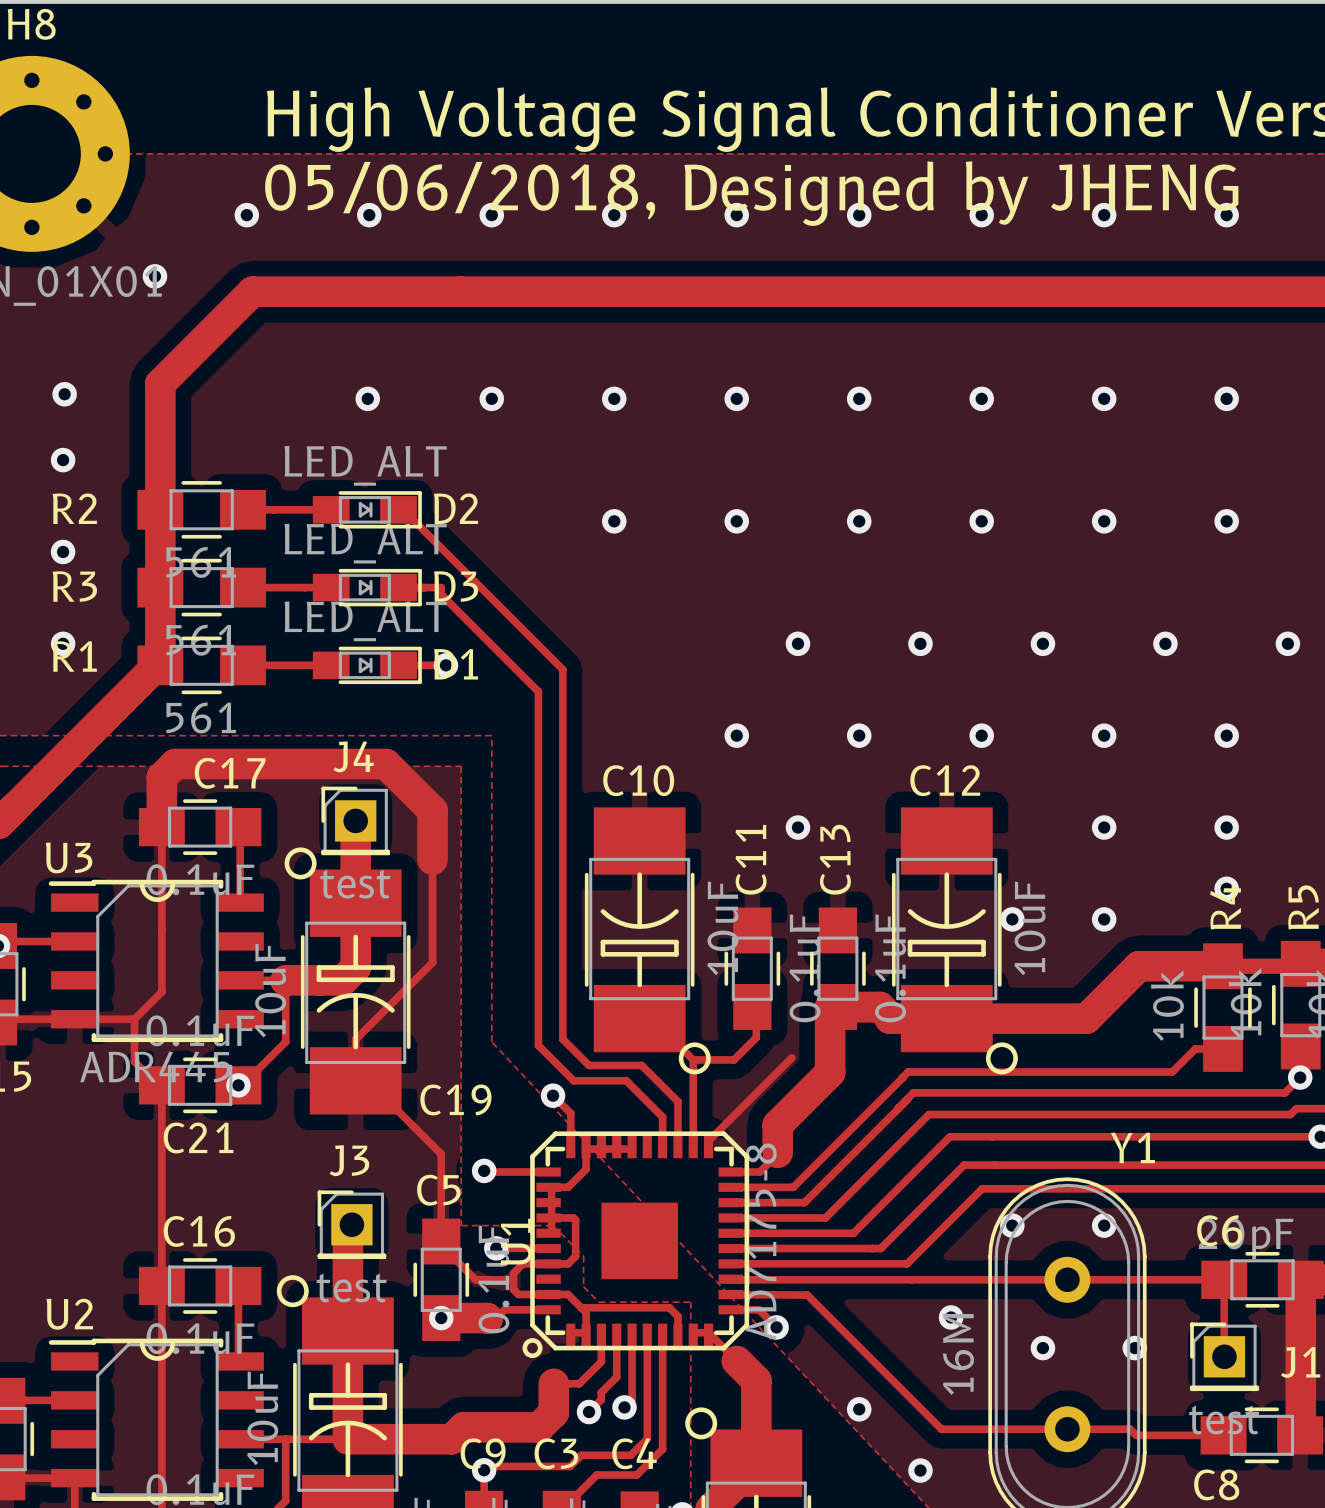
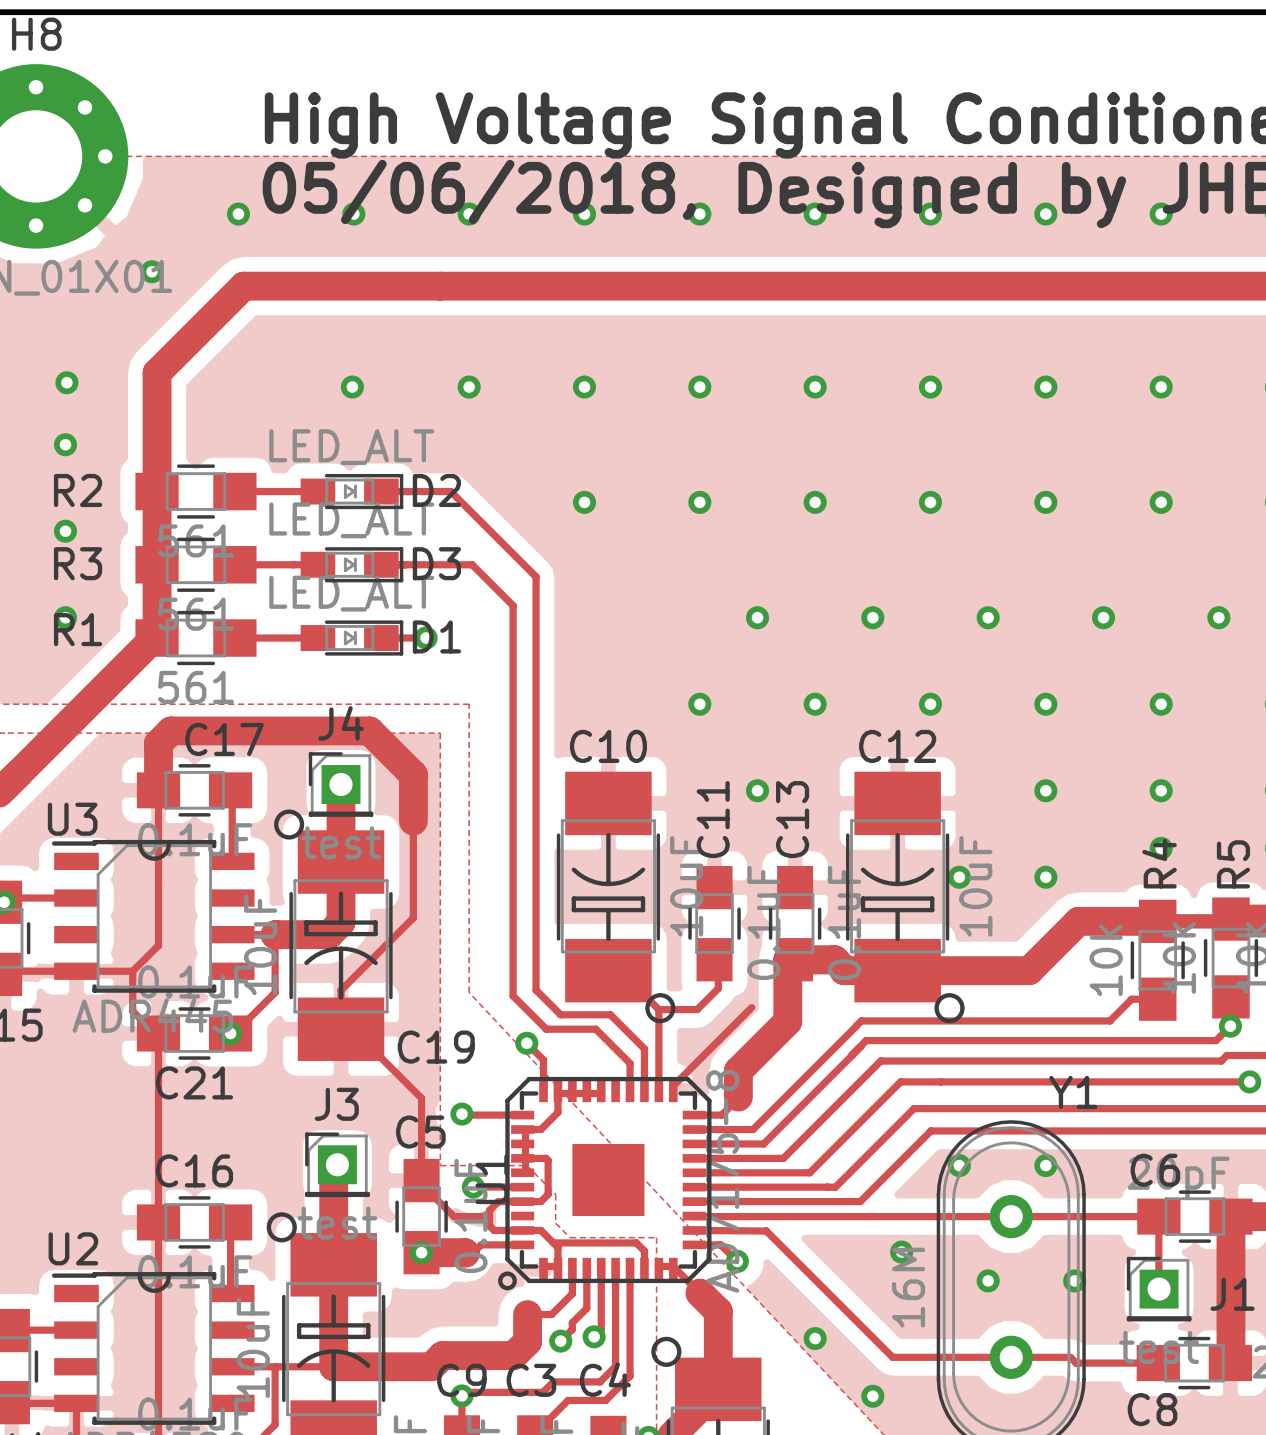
track: (403, 509) (562, 669) -> (385, 491) (450, 491) (536, 576) (536, 641)
track: (441, 587) (441, 594) (538, 691) -> (421, 564) (472, 564) (513, 605) (513, 662)

